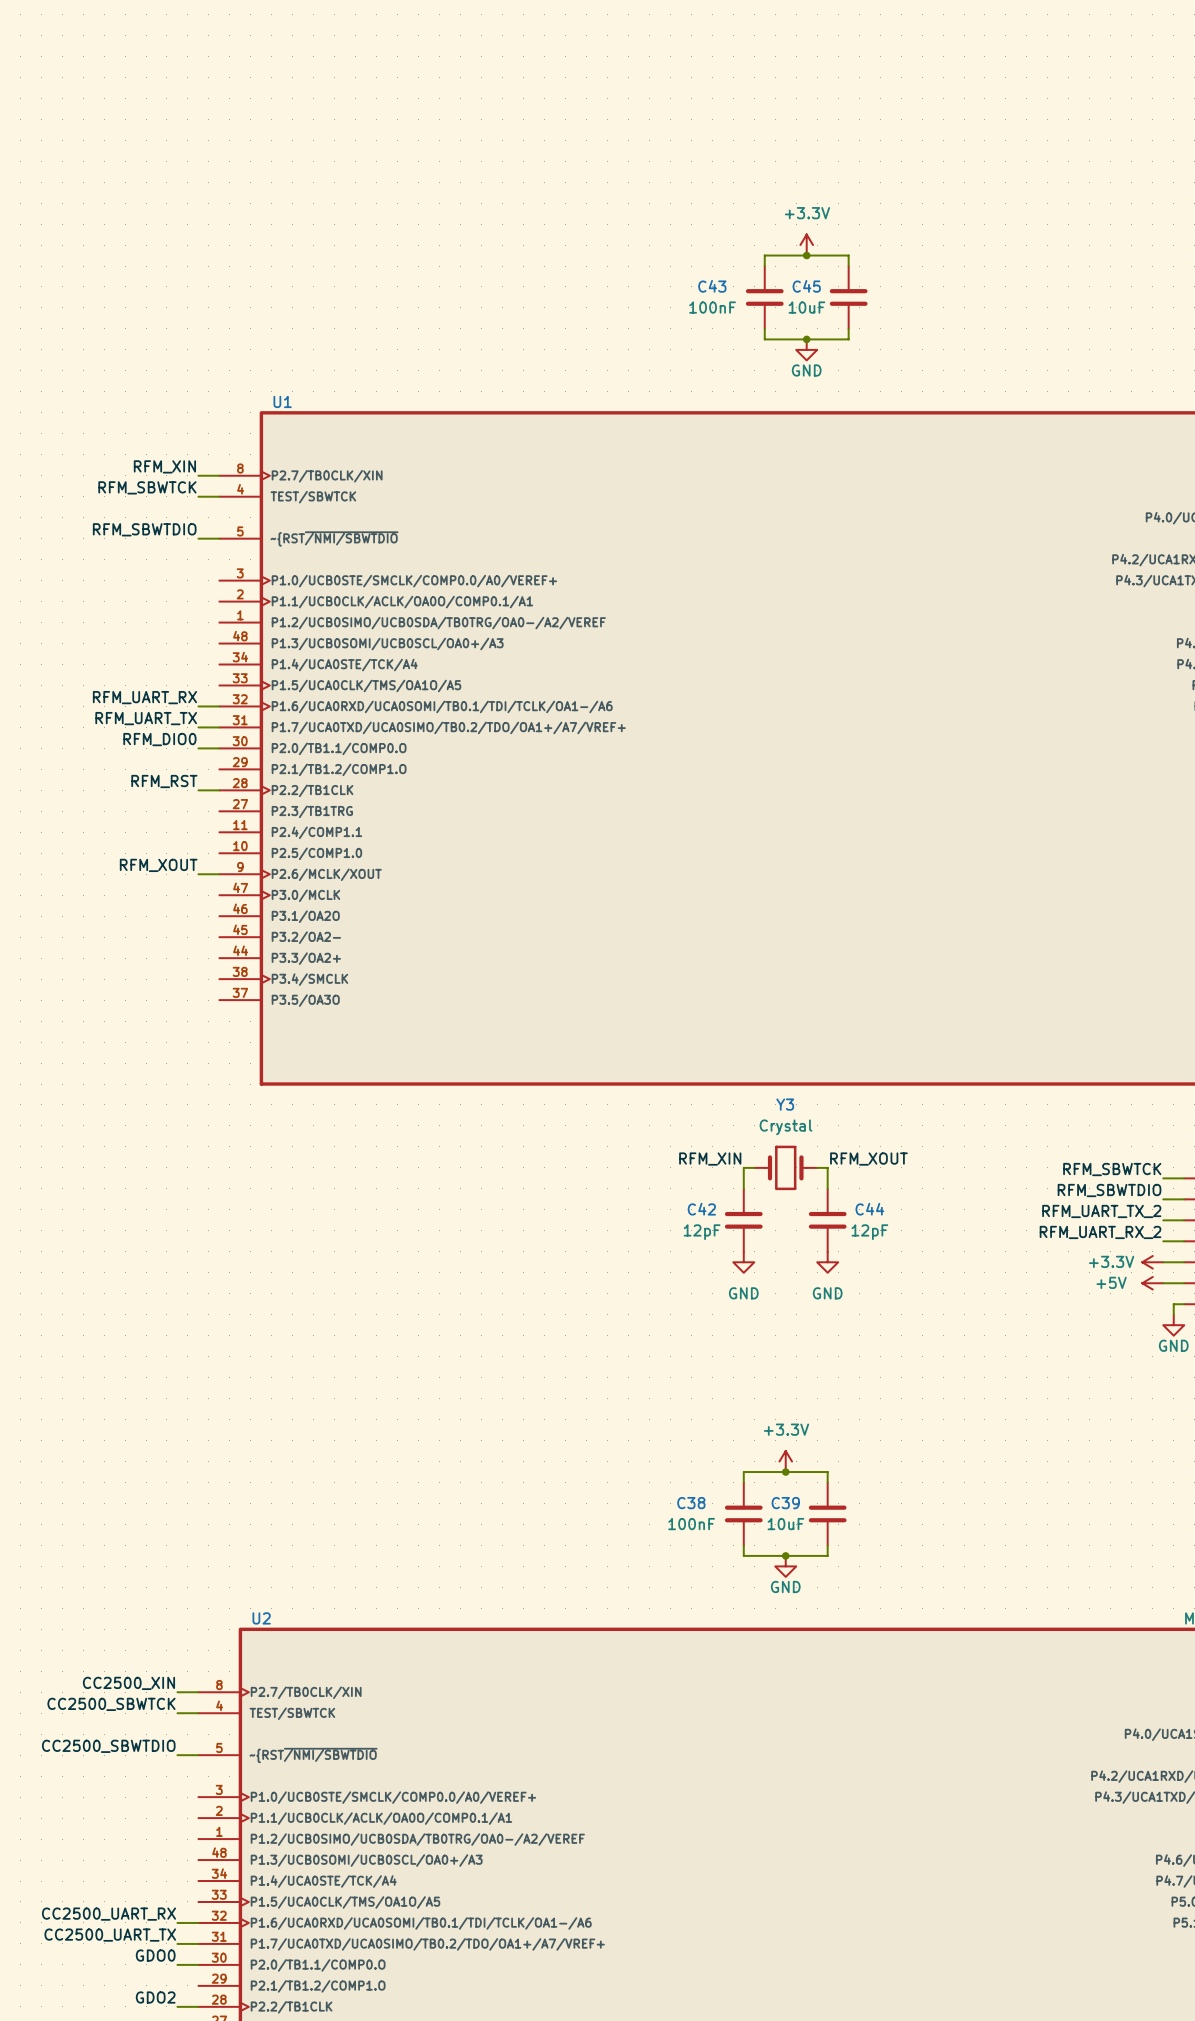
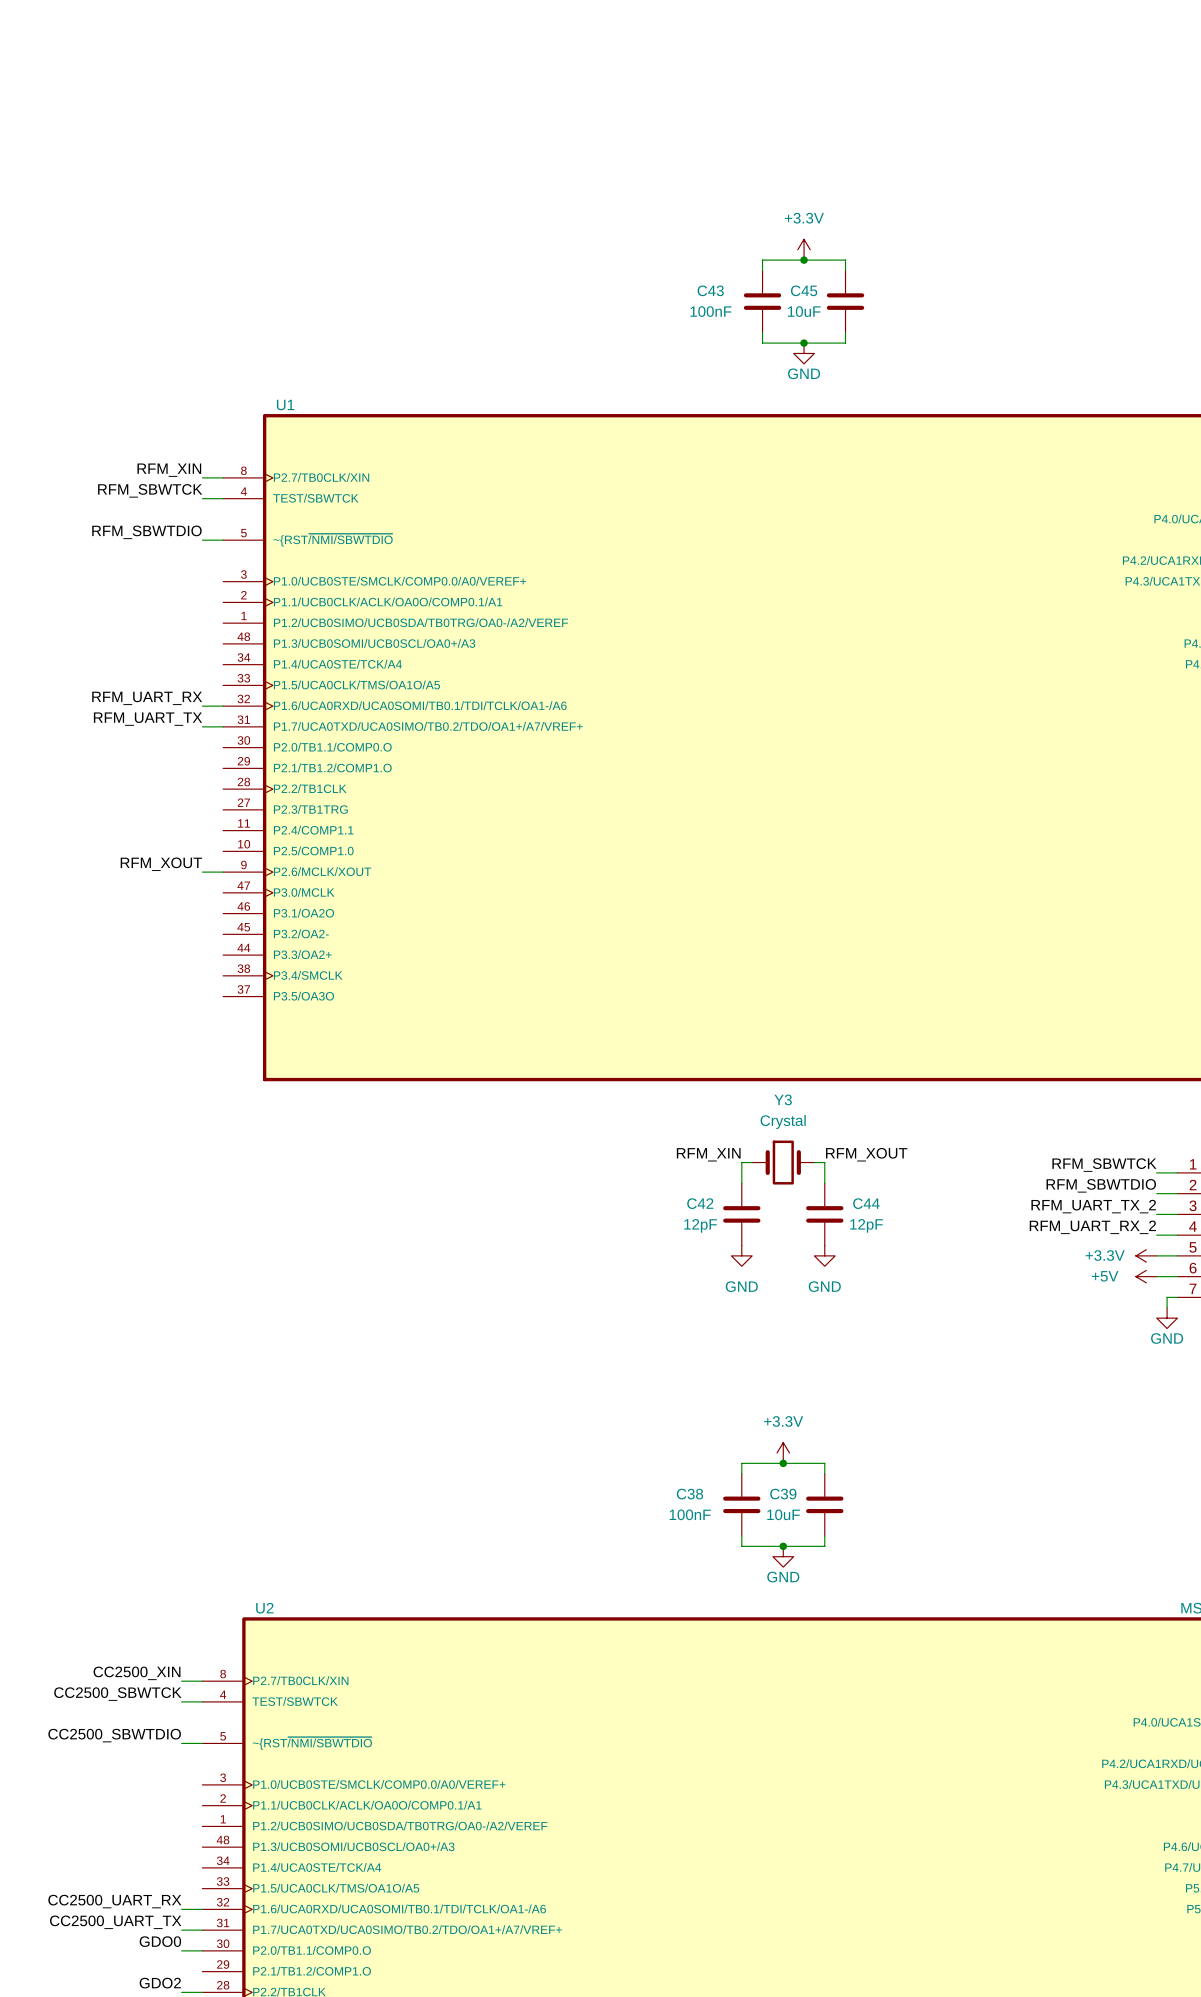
label: RFM_DIO0 (159, 739) -> none
wire: (198, 748) (219, 748) -> none
label: RFM_RST (164, 781) -> none
wire: (198, 790) (219, 790) -> none

